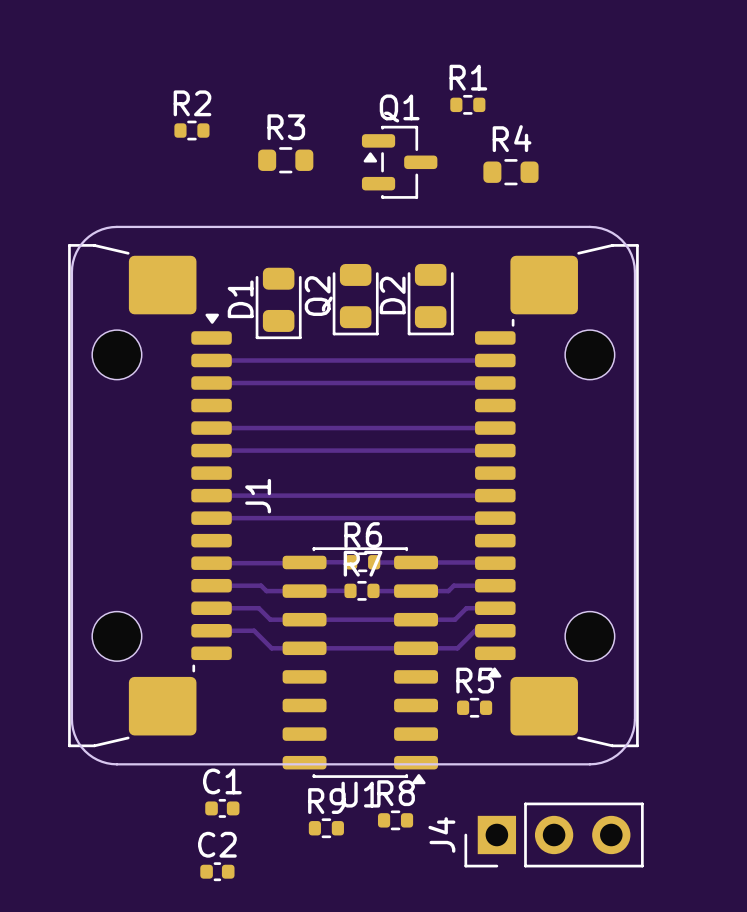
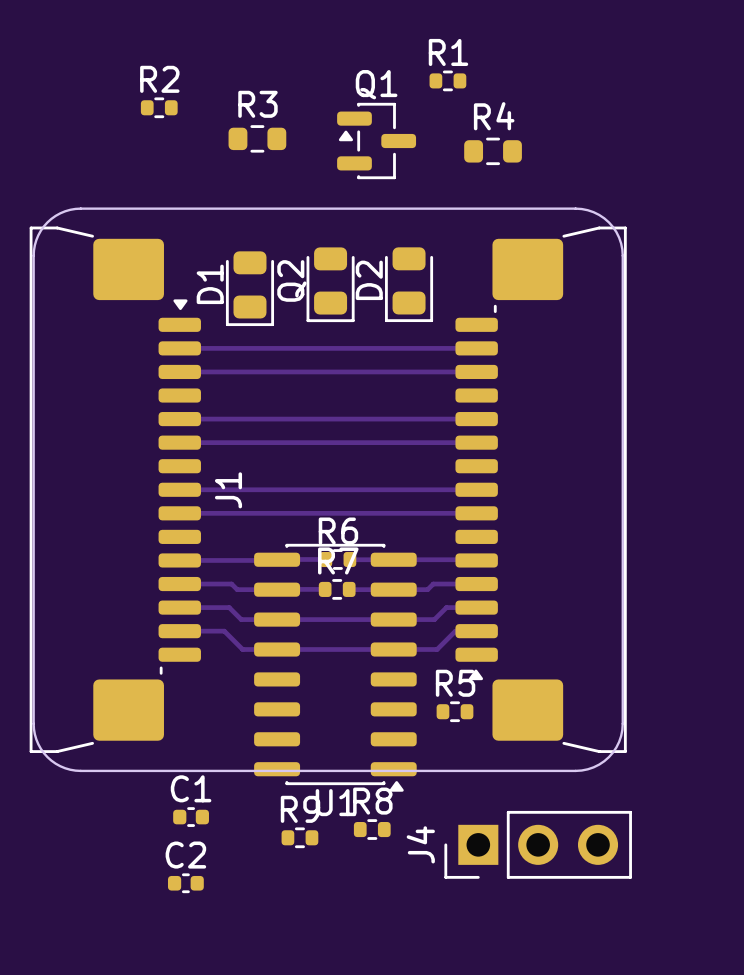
part: (116, 354) -> none
part: (589, 354) -> none
part: (116, 636) -> none
part: (589, 636) -> none

